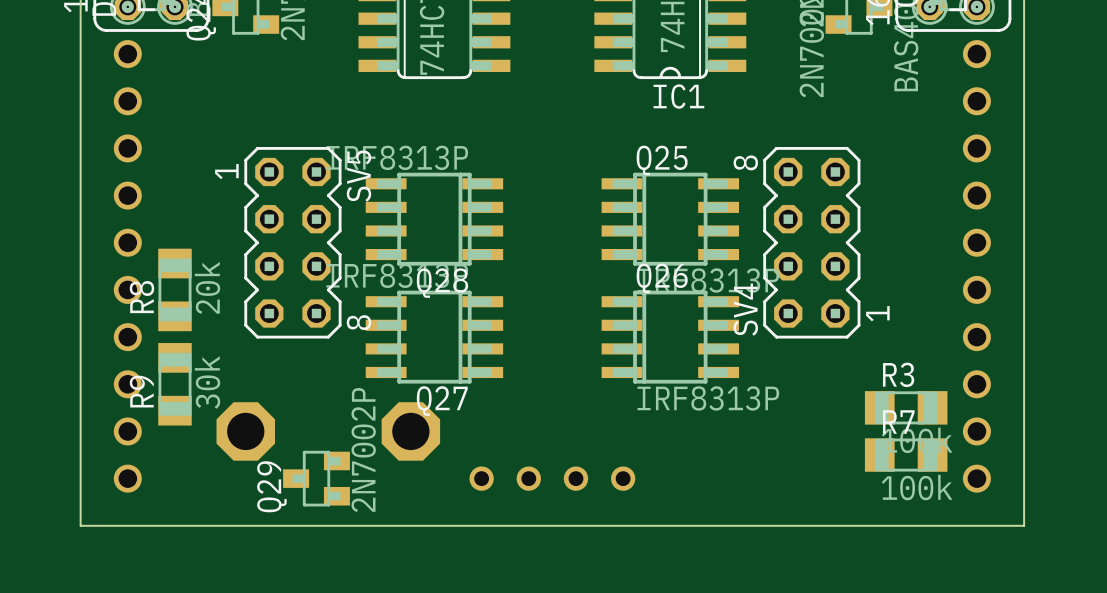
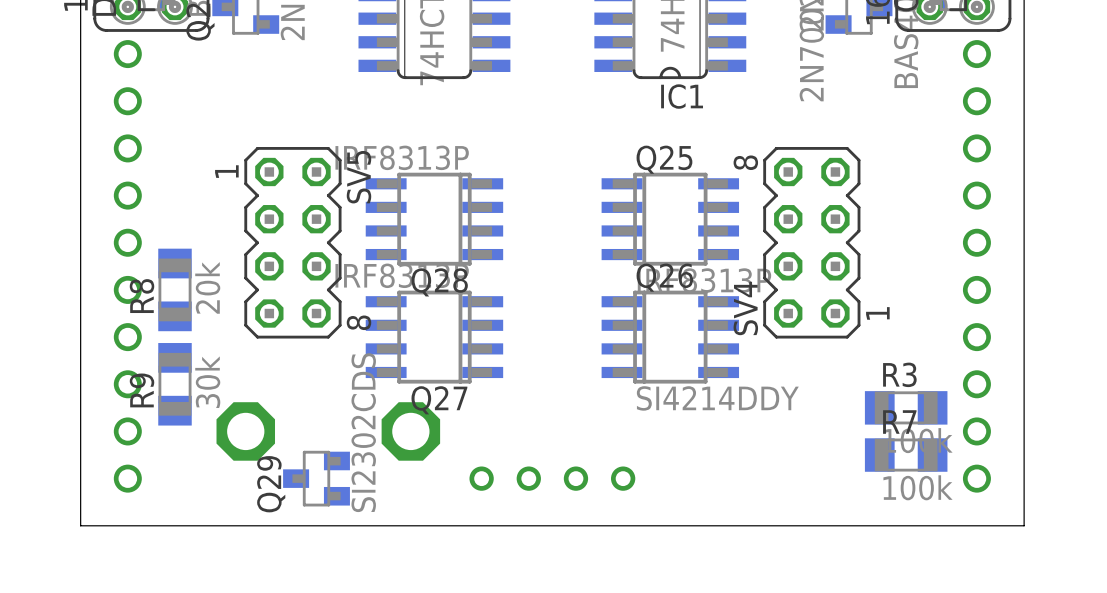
Q26 value: IRF8313P (708, 398) -> SI4214DDY (717, 398)
Q29 value: 2N7002P (363, 450) -> SI2302CDS (363, 432)

